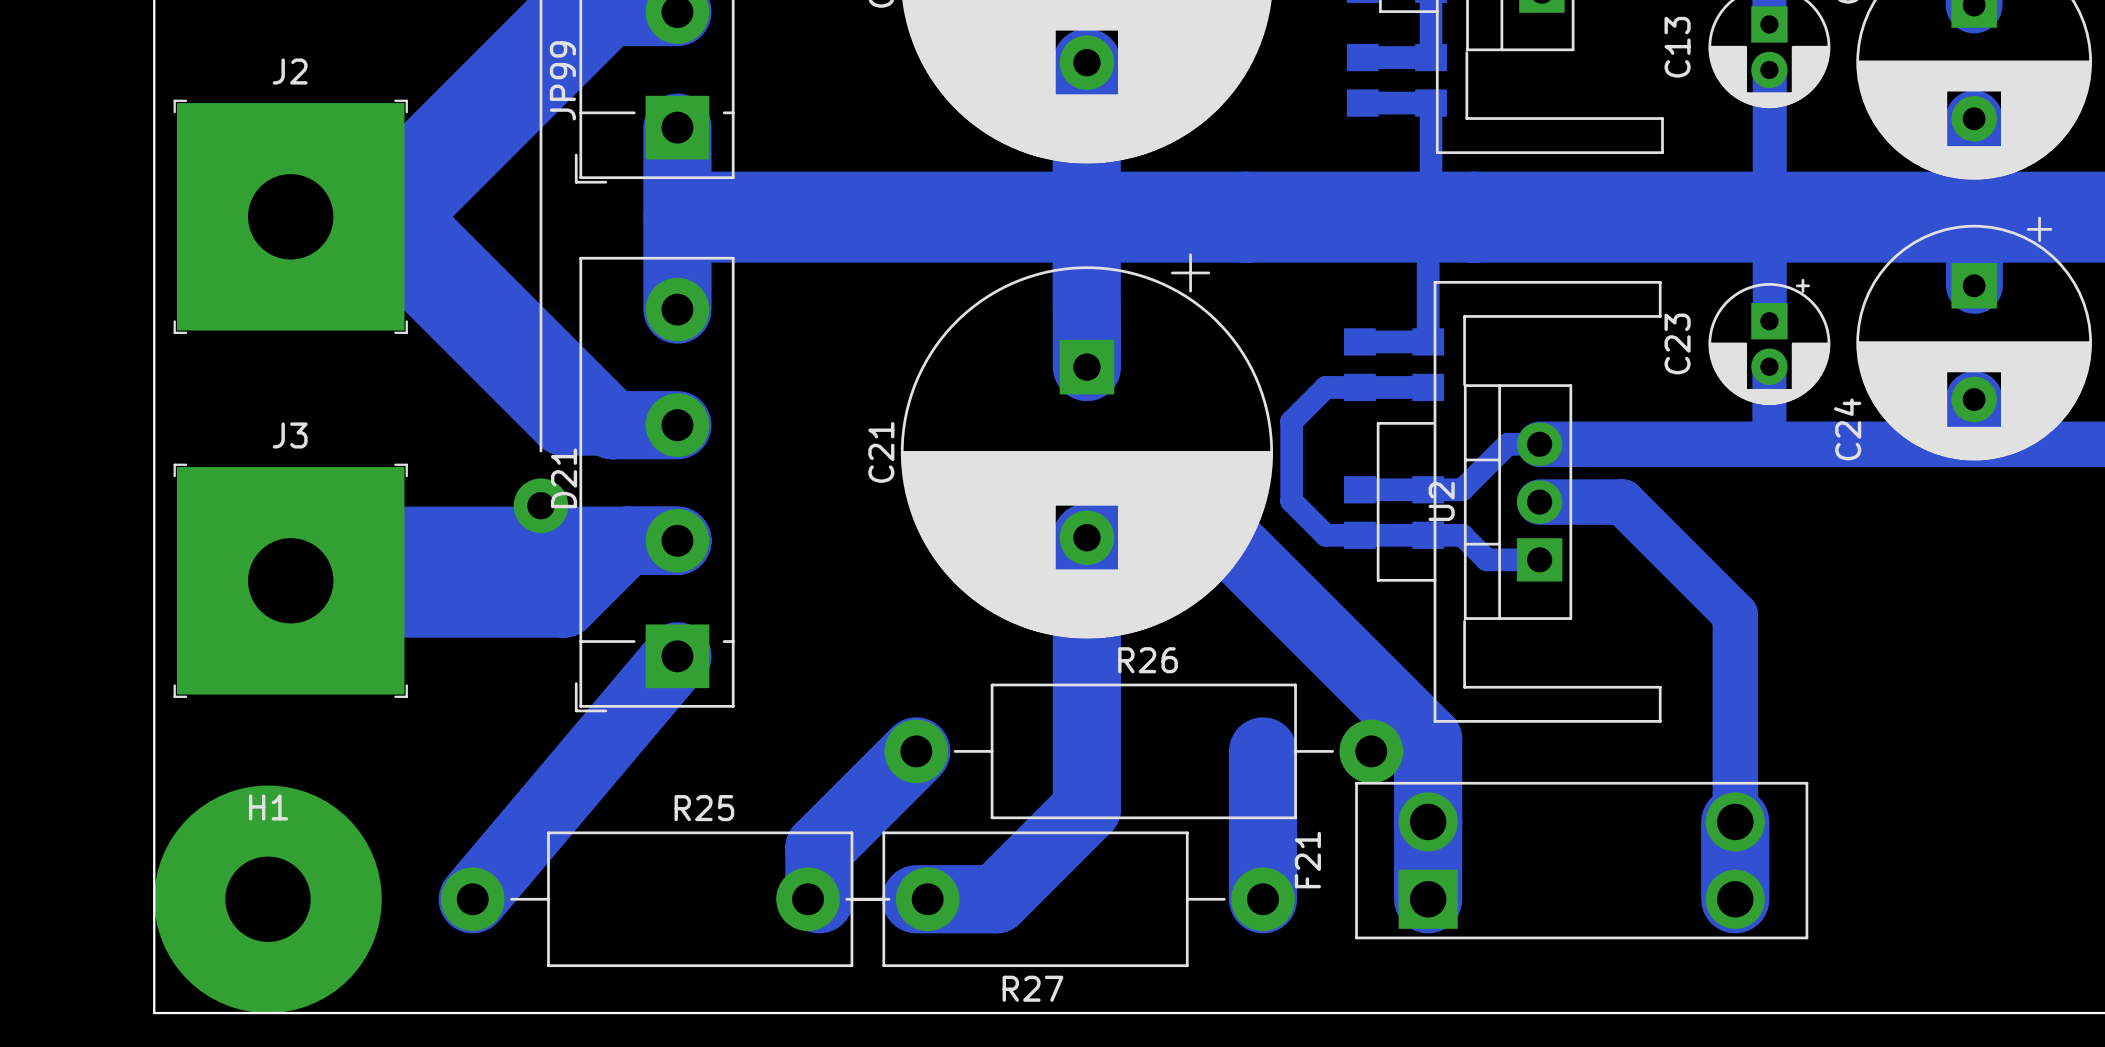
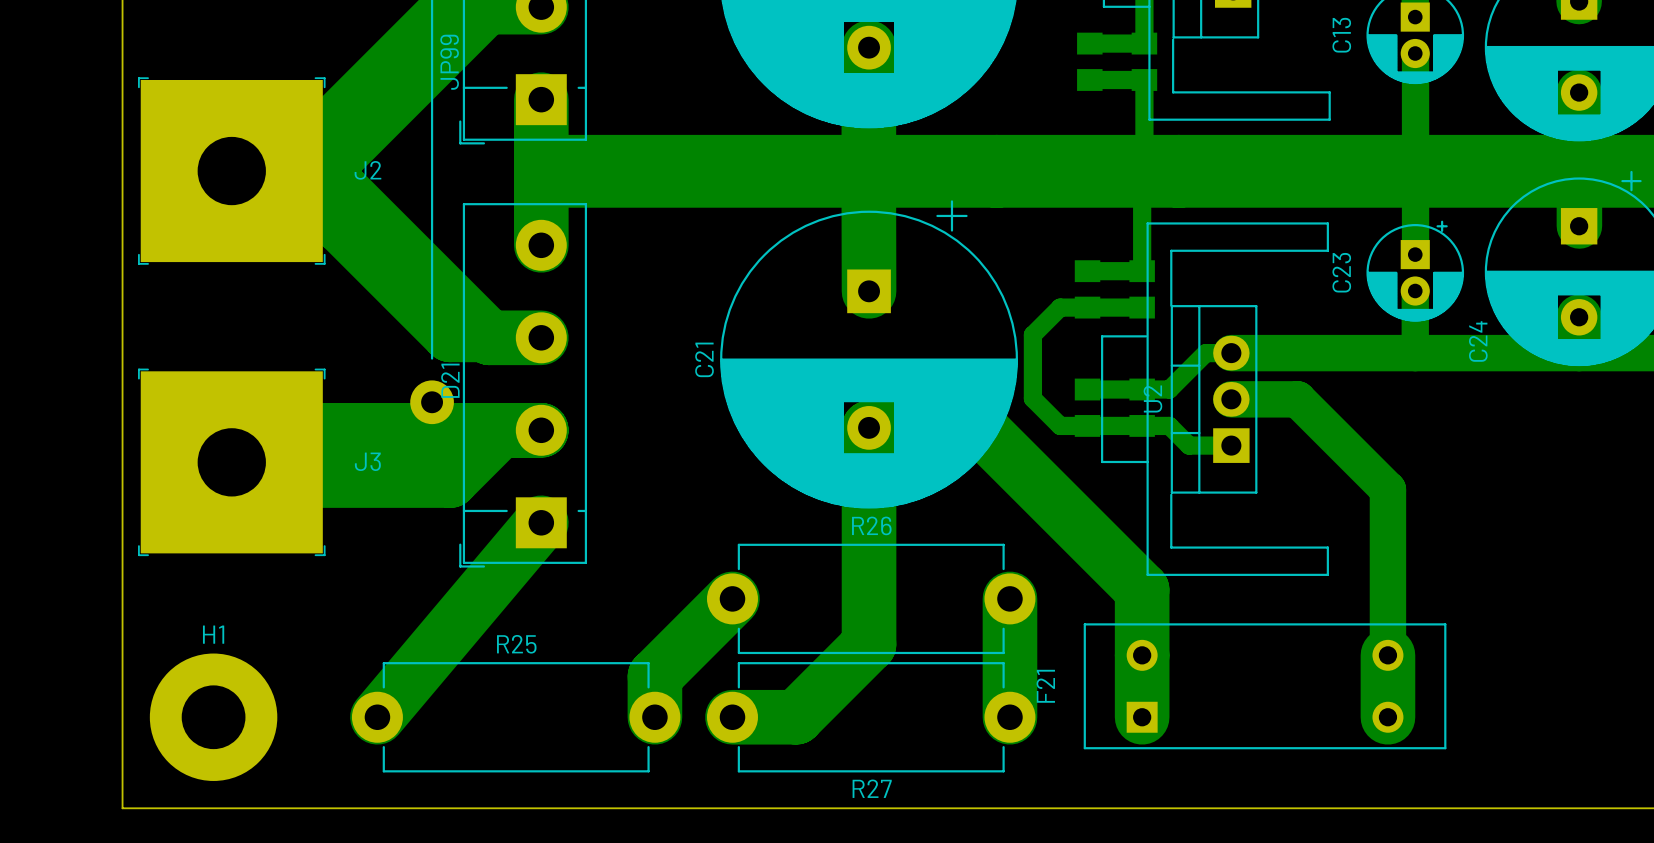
J2 name position: J2 (290, 71) -> J2 (367, 170)
J3 name position: J3 (290, 435) -> J3 (367, 461)
R26 footprint: [884, 683, 1404, 820] -> [707, 543, 1036, 655]
F21 footprint: [1355, 781, 1809, 940] -> [1083, 623, 1447, 750]
H1 footprint: [154, 785, 382, 1014] -> [149, 653, 278, 781]
R25 footprint: [440, 831, 960, 968] -> [351, 662, 681, 773]
R27 footprint: [776, 831, 1295, 968] -> [707, 662, 1036, 773]

